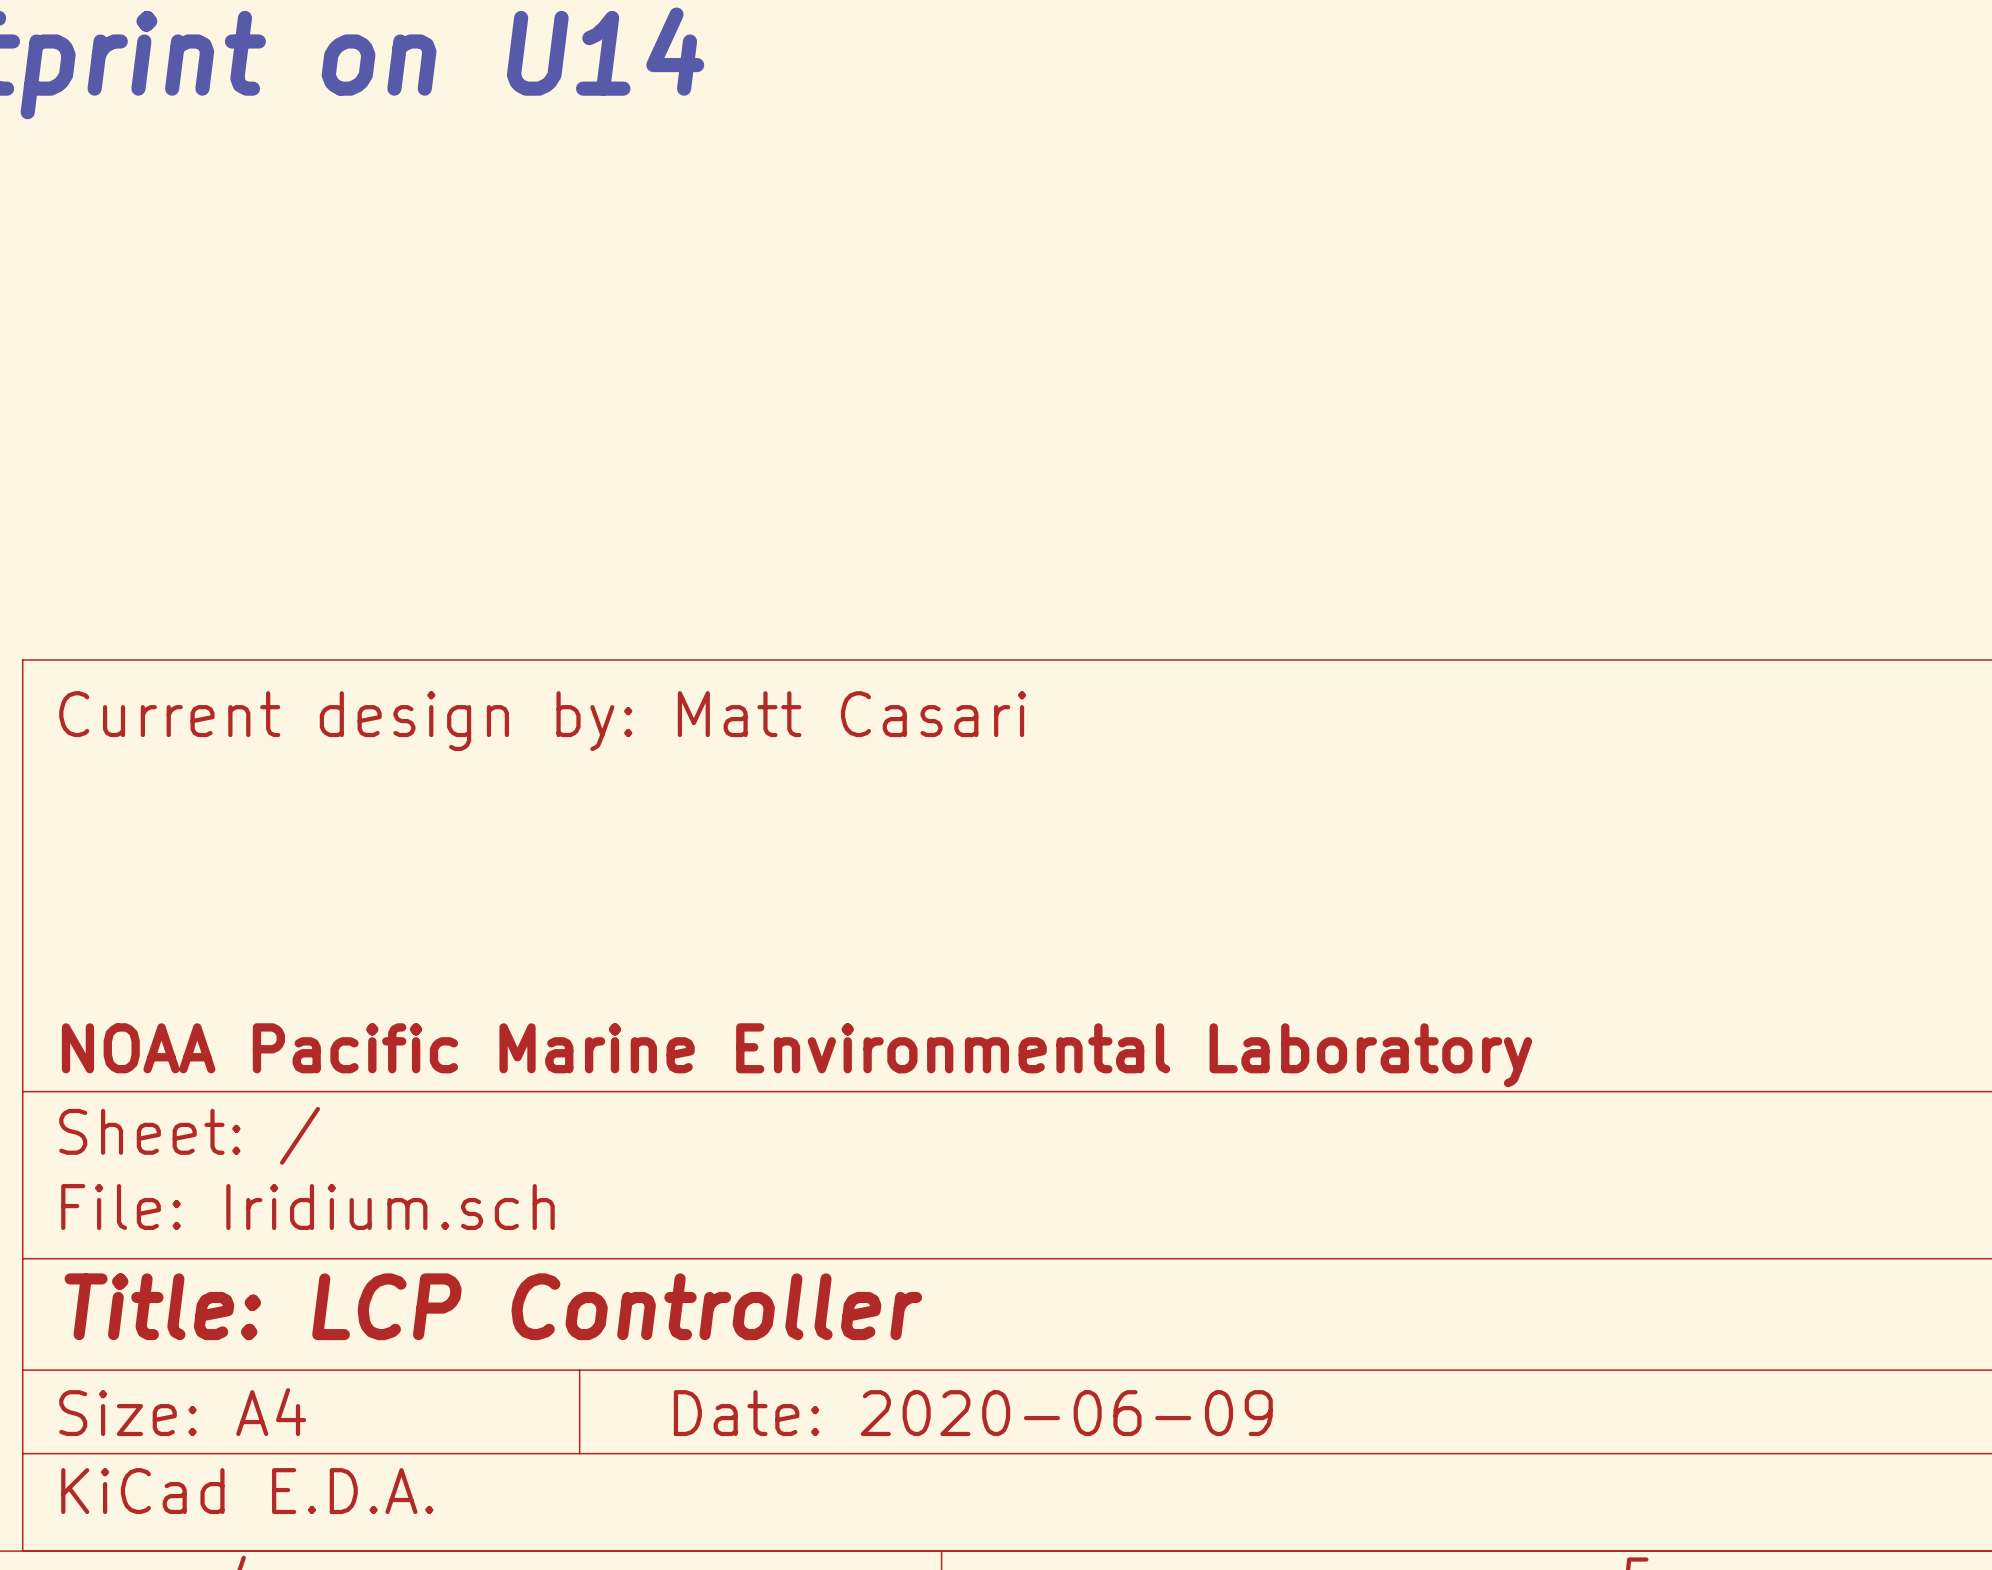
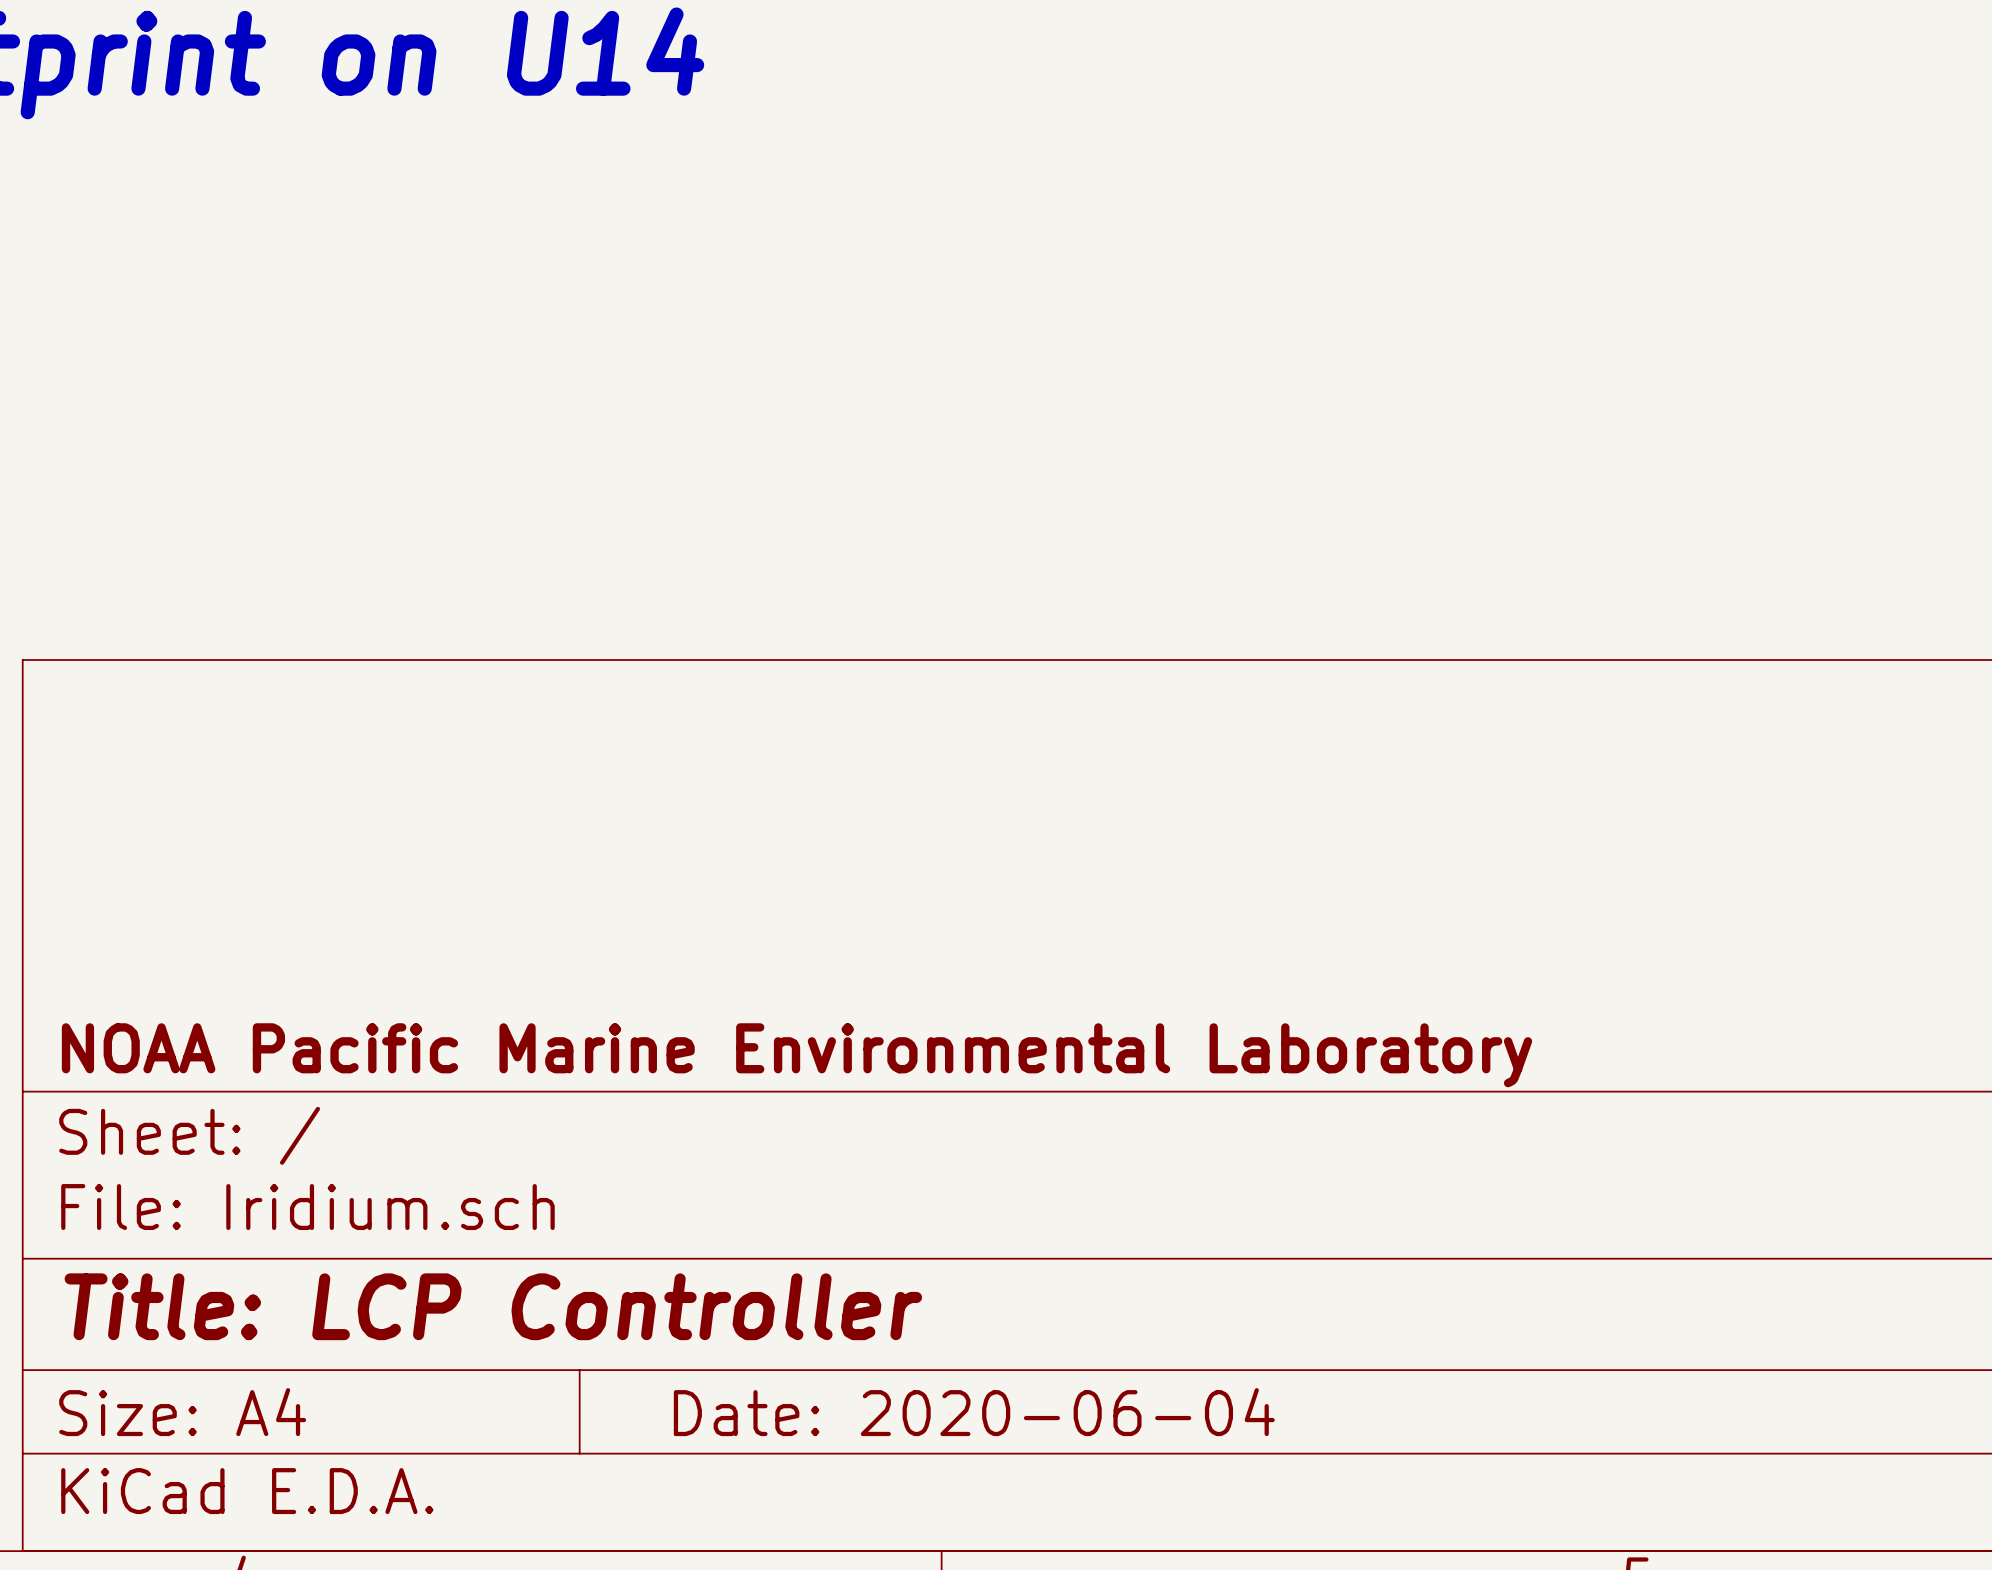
title block: Current design by: Matt Casari (542, 721) -> none
title block: Date: 2020-06-09 (973, 1413) -> Date: 2020-06-04 (974, 1412)

